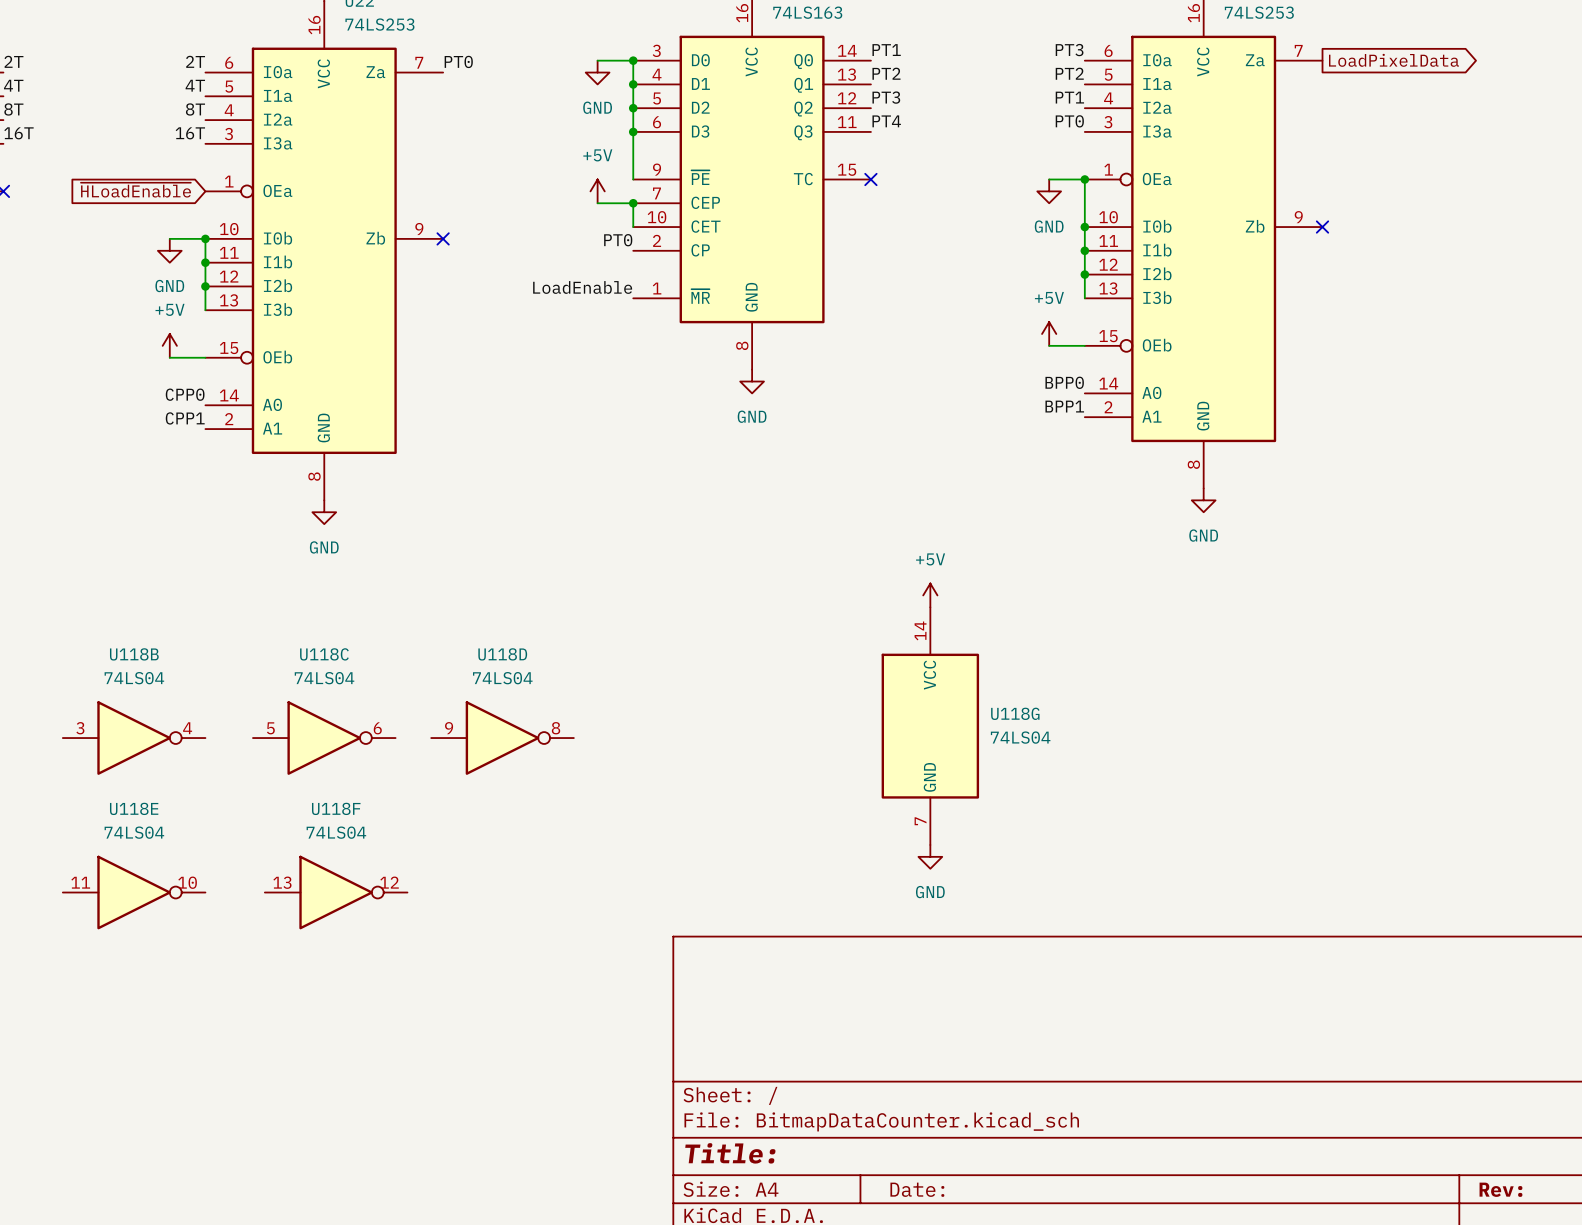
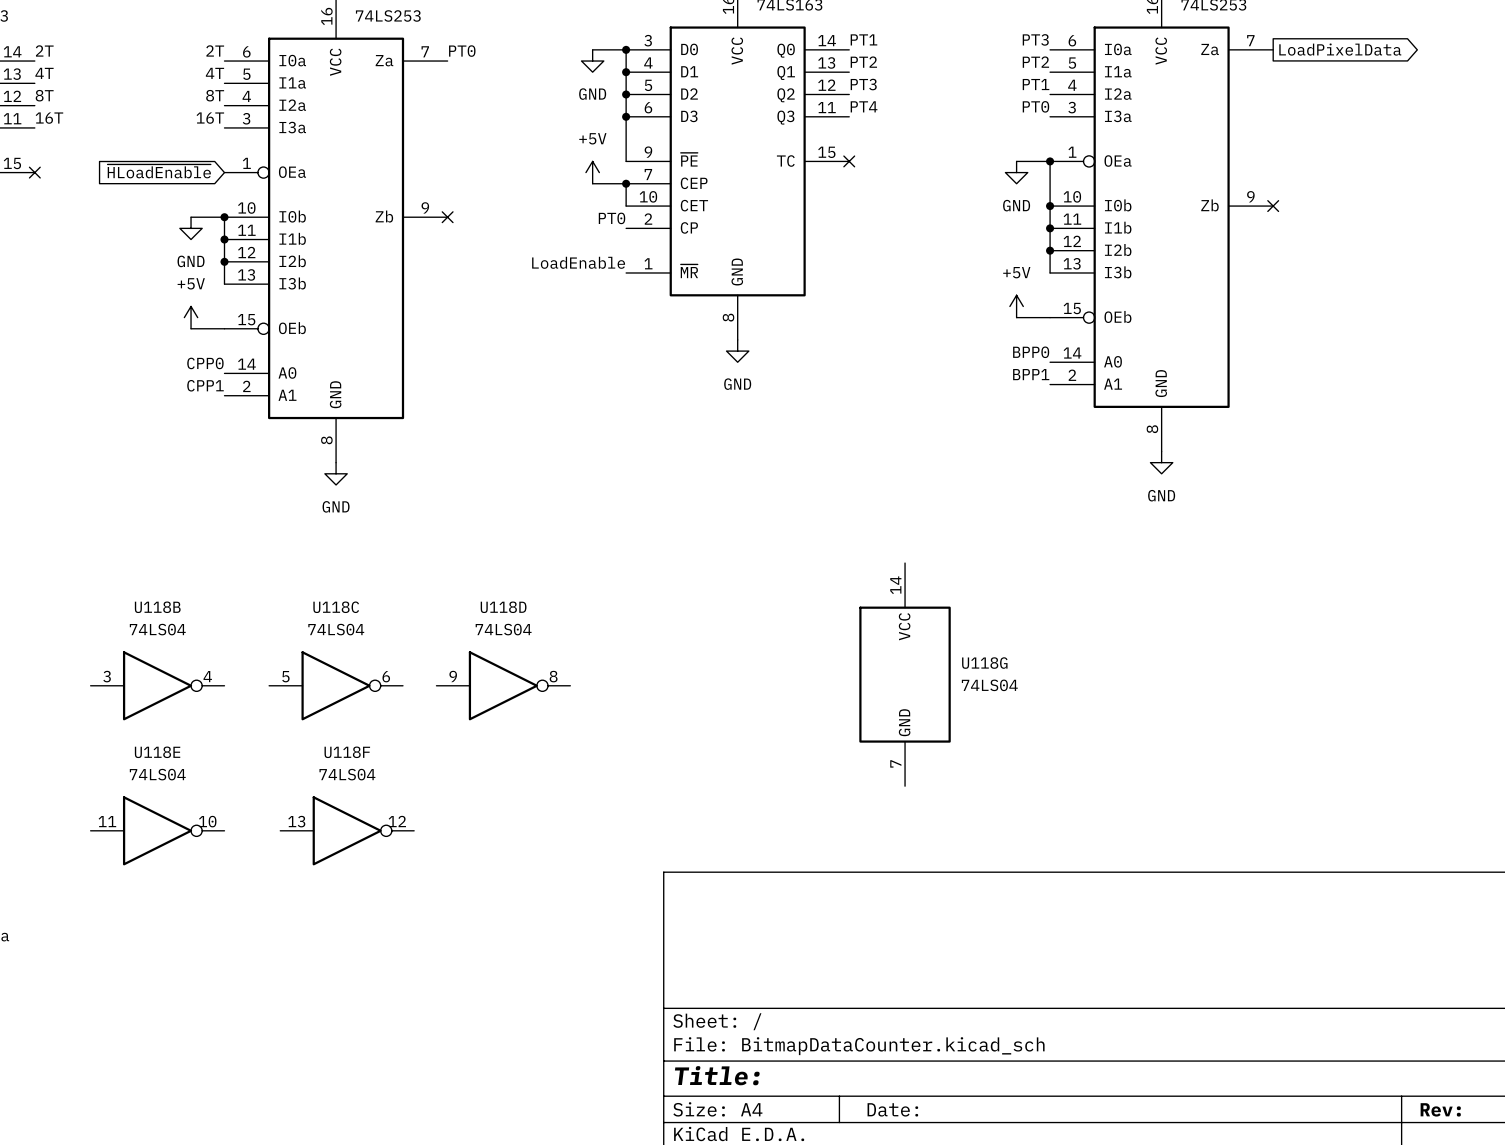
power symbol: +5V (930, 595) -> none
power symbol: GND (930, 856) -> none

